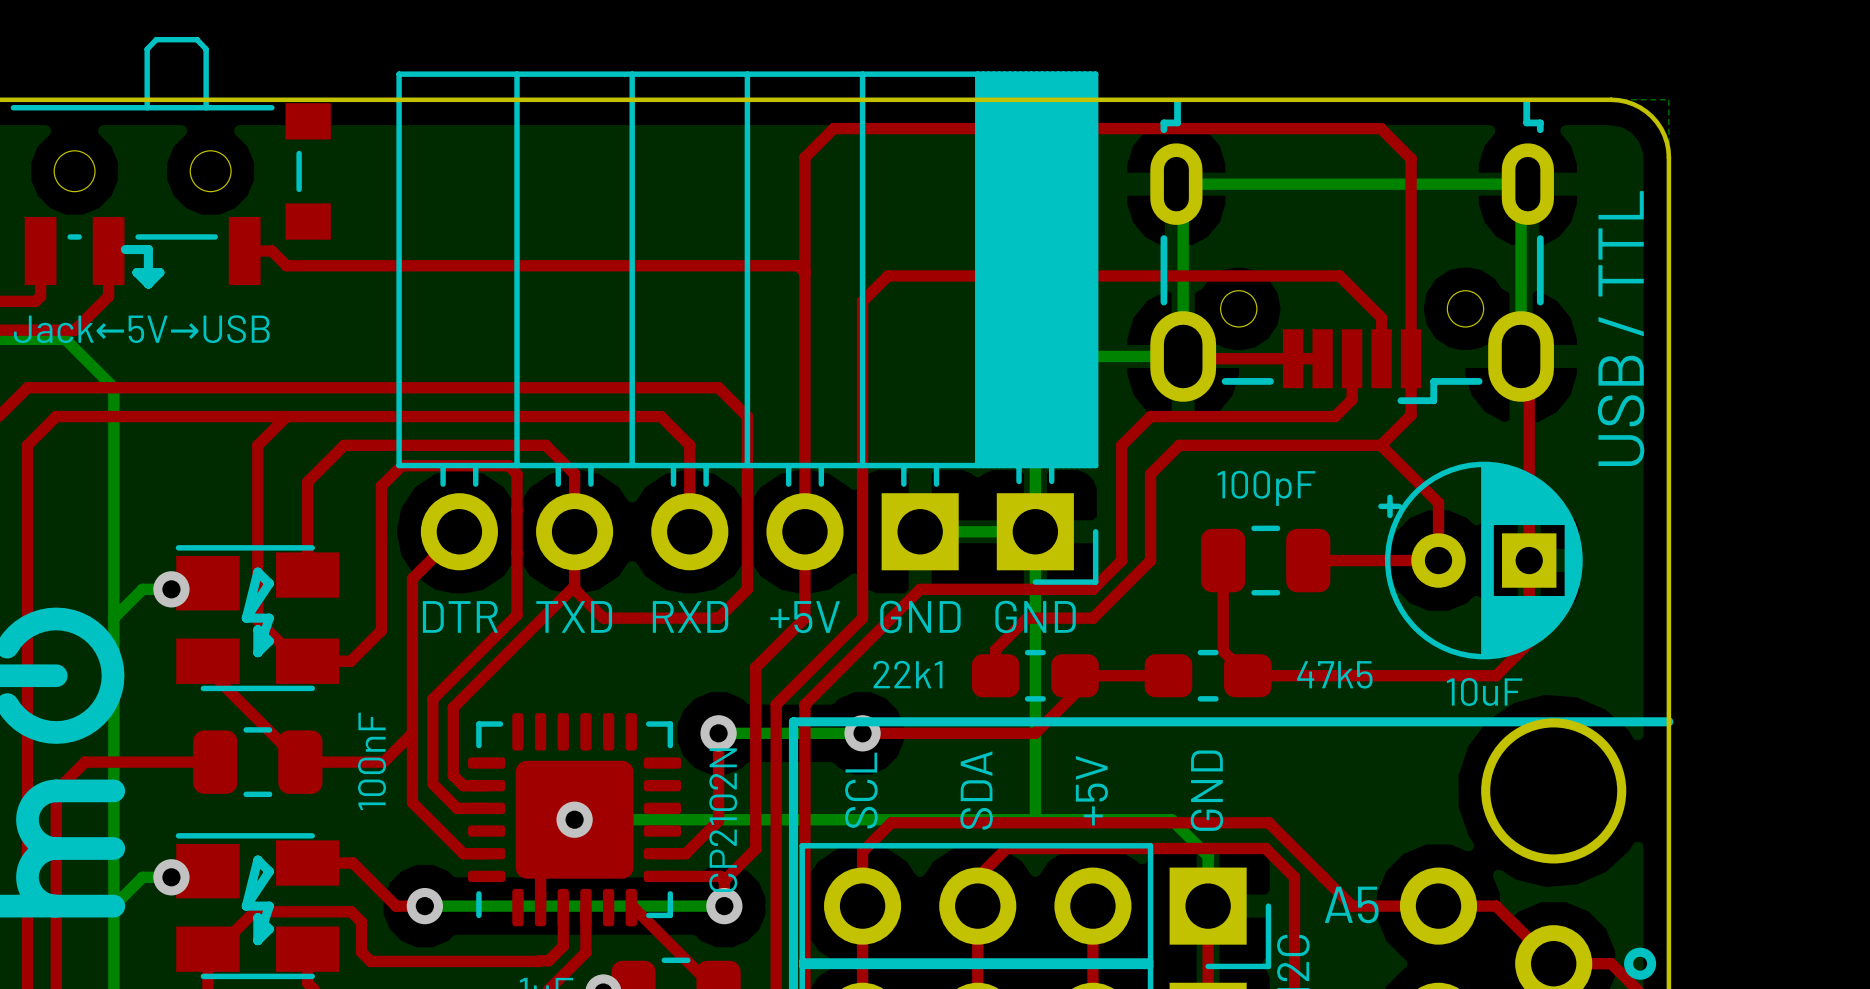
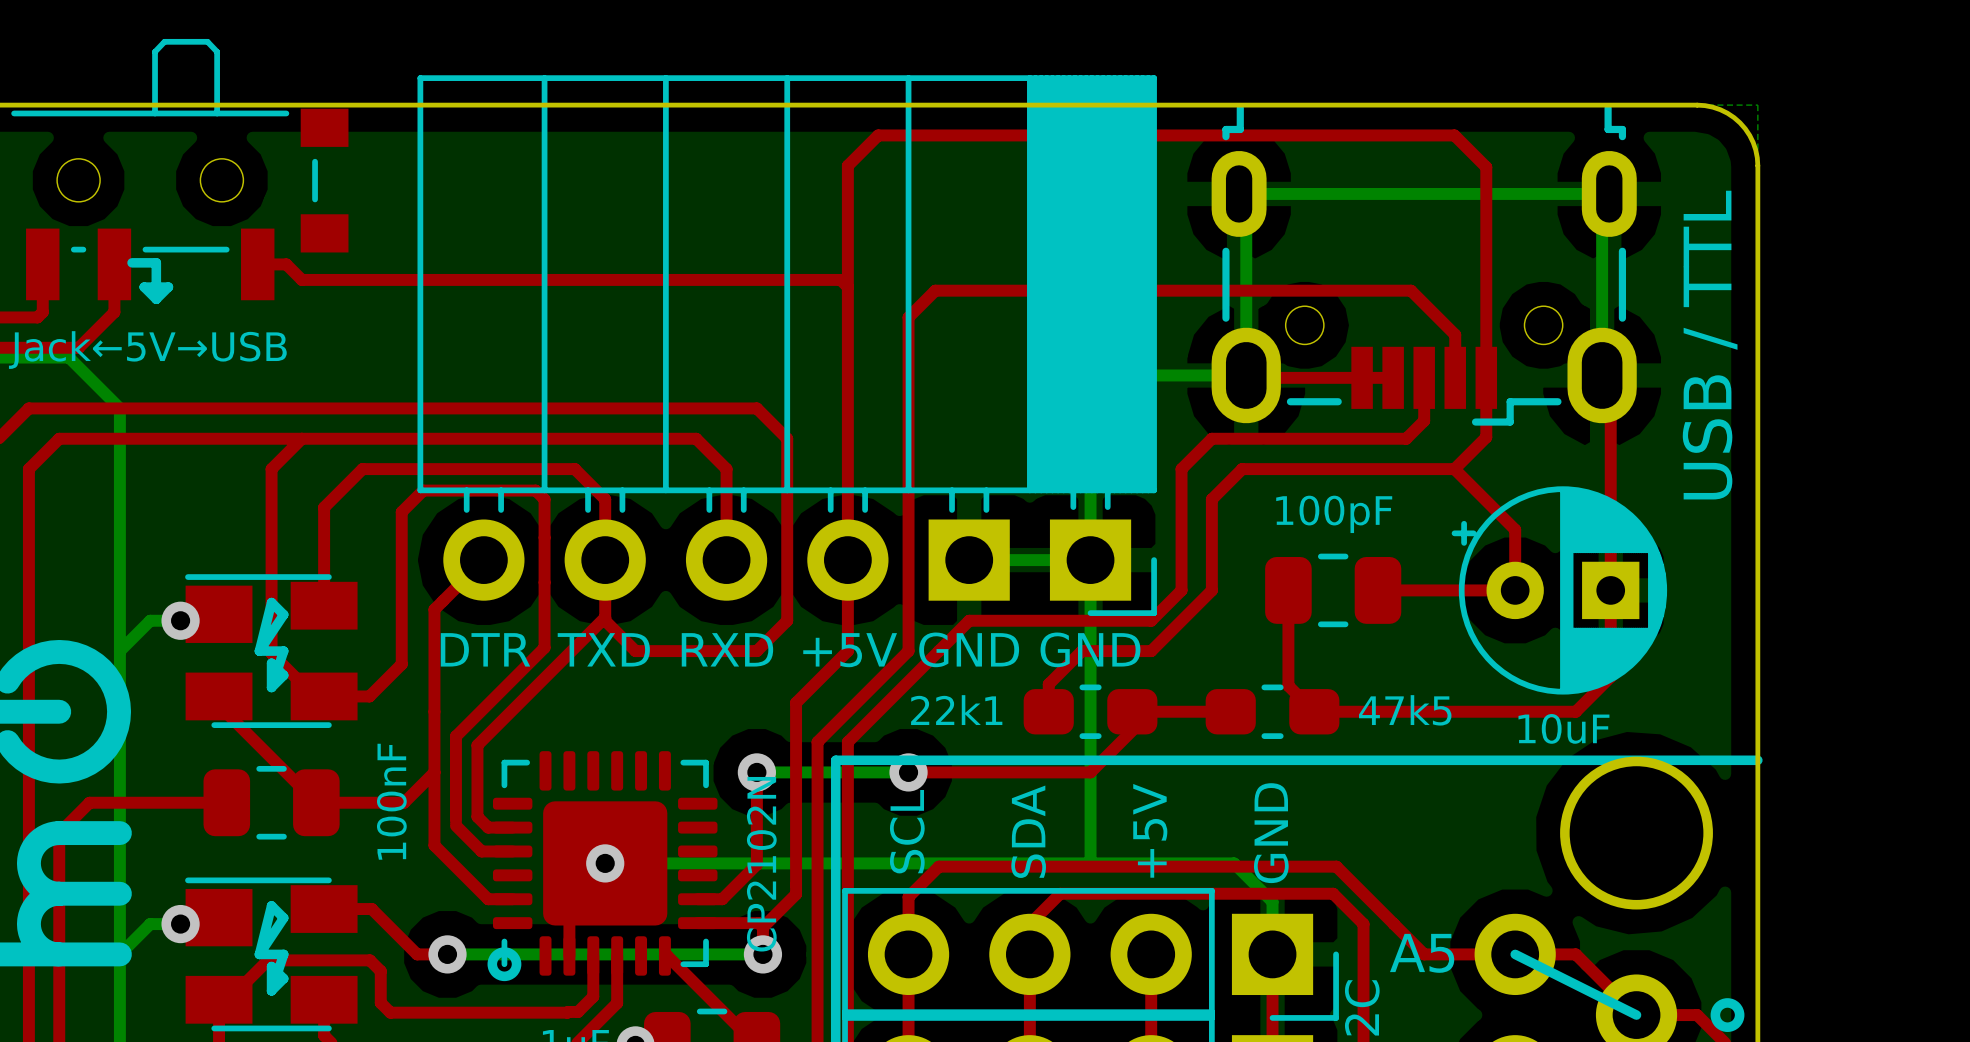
drawing: none -> [487, 947, 522, 982]
line: none -> (1515, 954) (1636, 1015)

